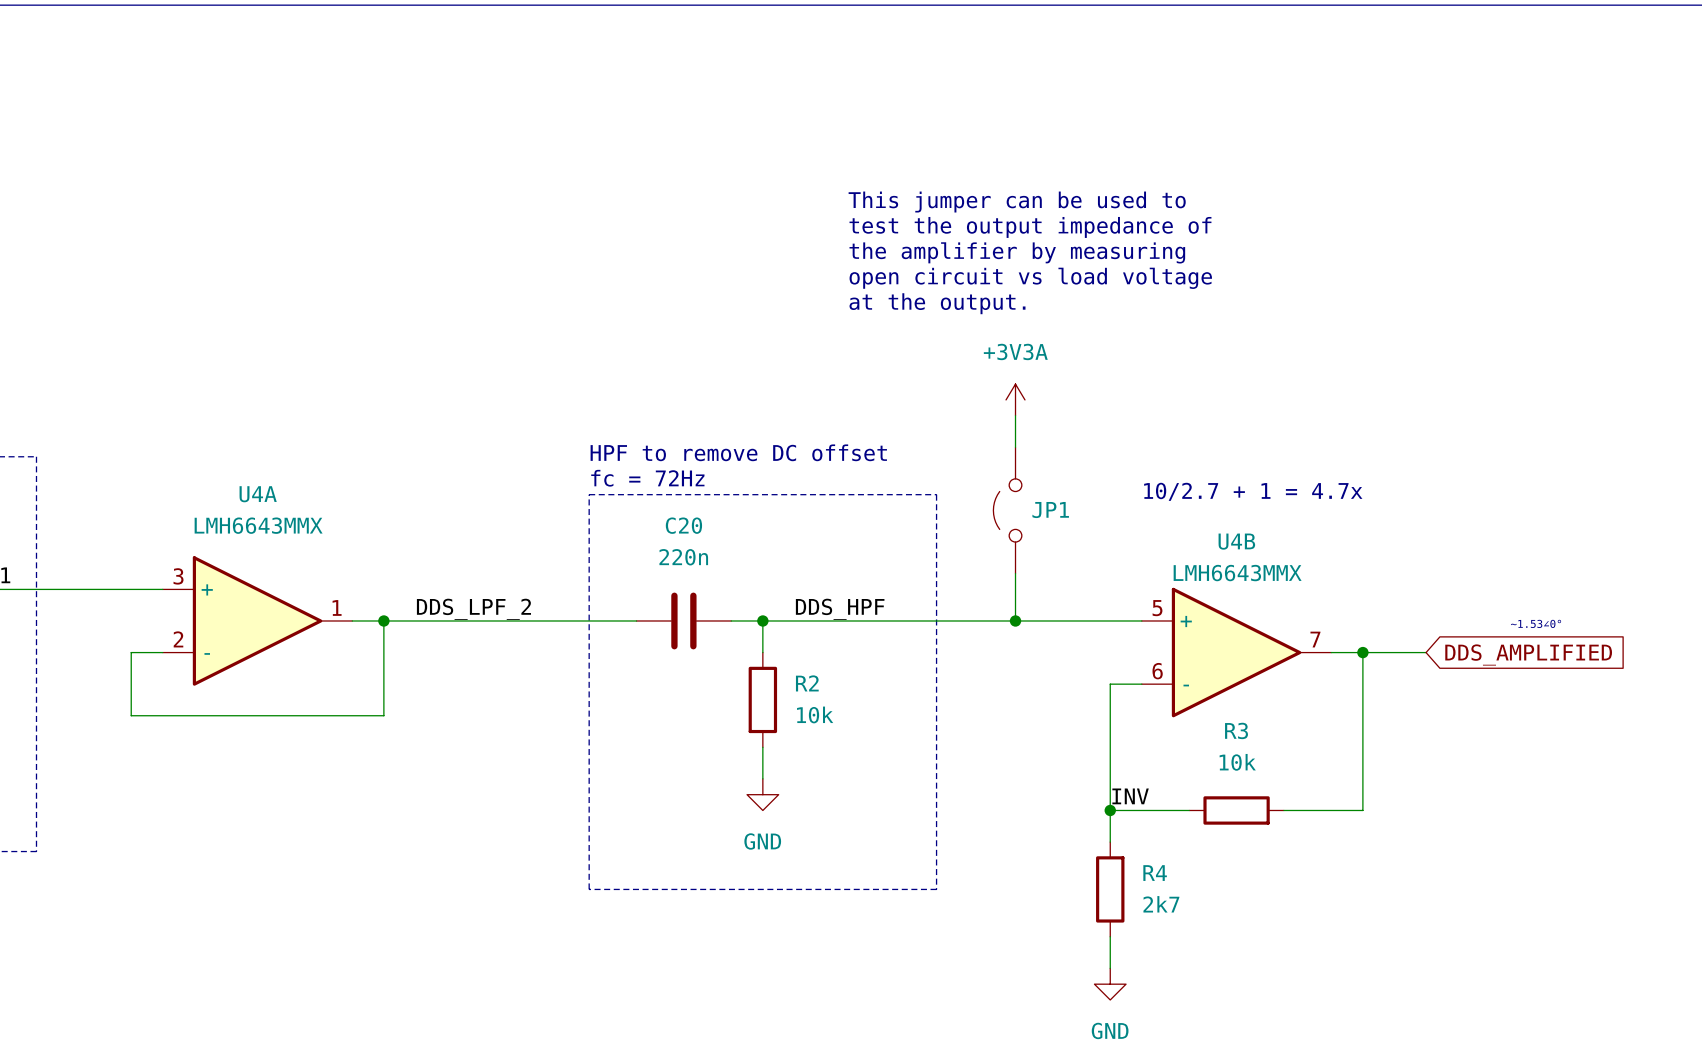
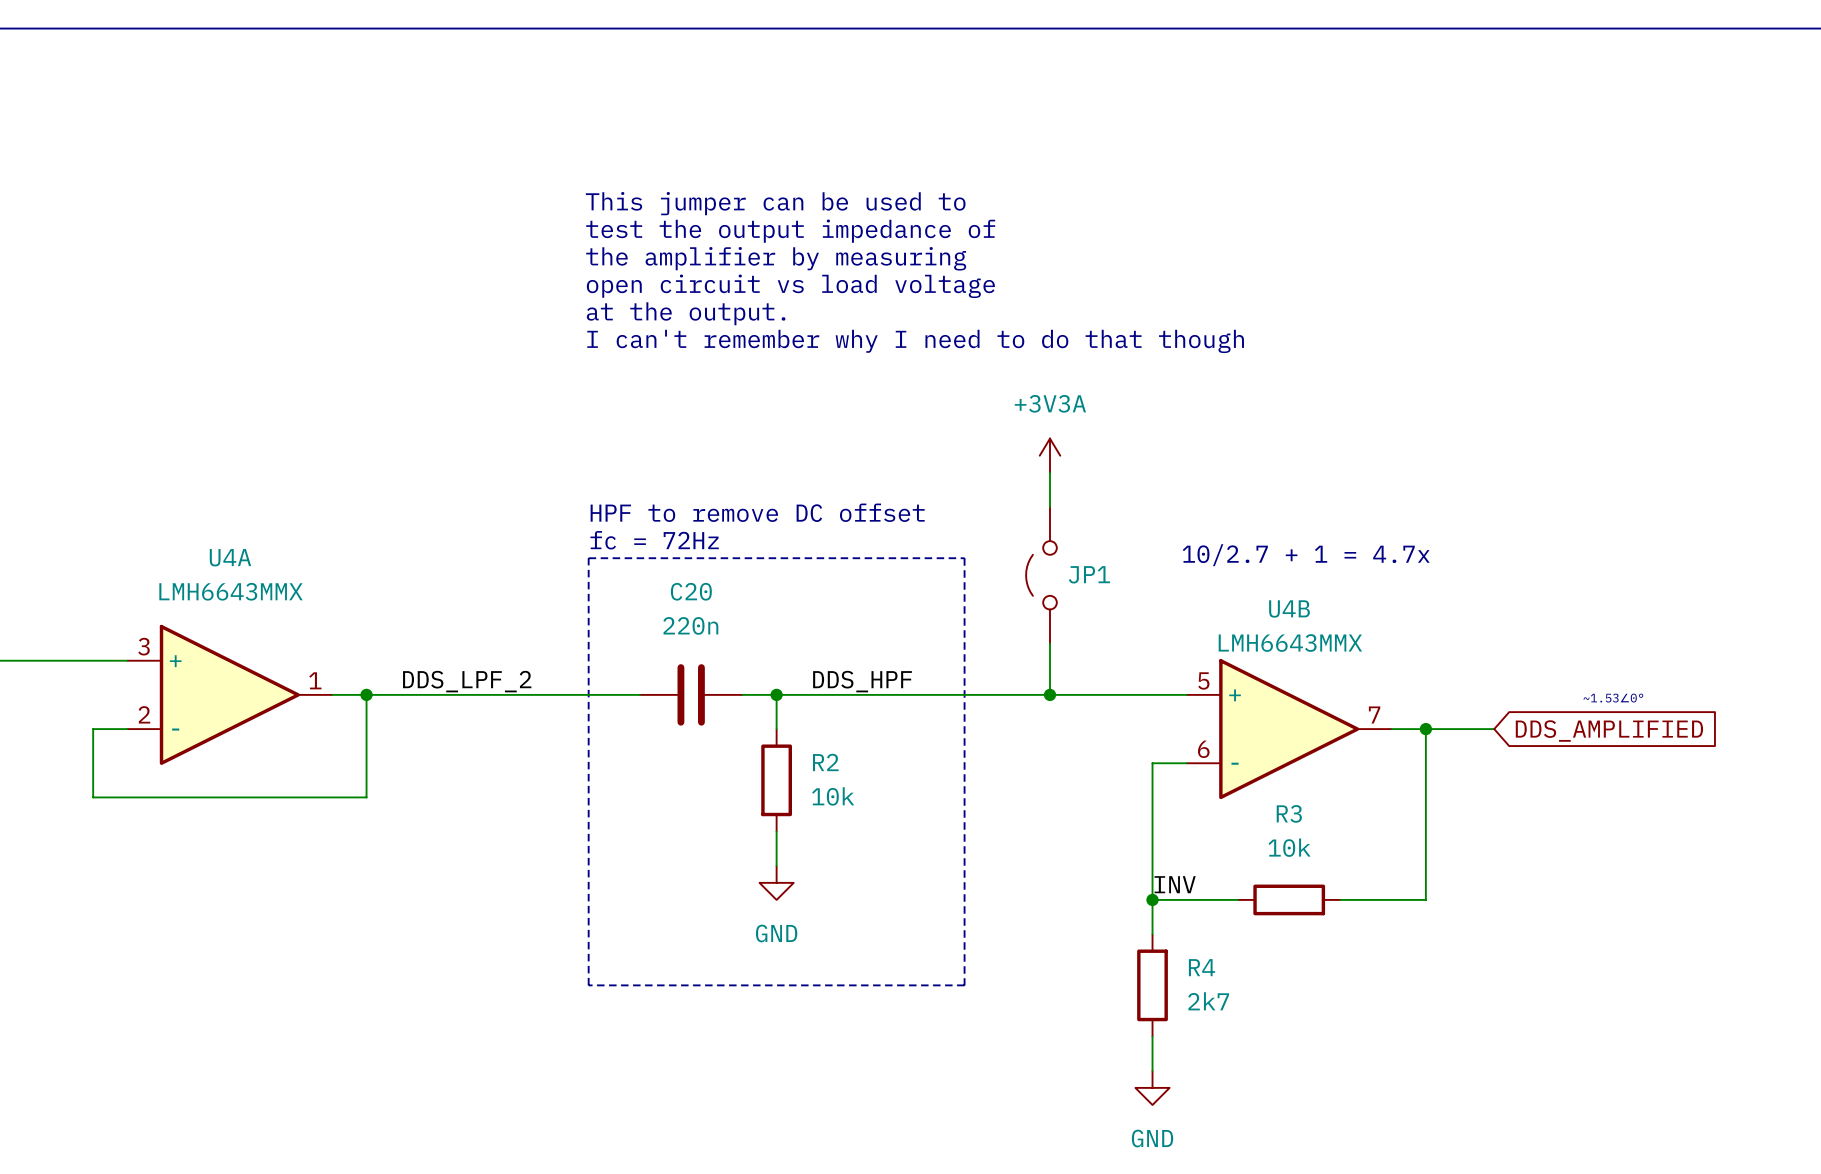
text position: This jumper can be used to (1017, 202) -> This jumper can be used to (775, 203)
text position: test the output impedance of (1030, 227) -> test the output impedance of (790, 231)
text position: the amplifier by measuring (1017, 252) -> the amplifier by measuring (776, 258)
text position: open circuit vs load voltage (1030, 278) -> open circuit vs load voltage (790, 286)
text: none -> I can't remember why I need to do that though (915, 341)
text position: at the output. (937, 303) -> at the output. (686, 313)

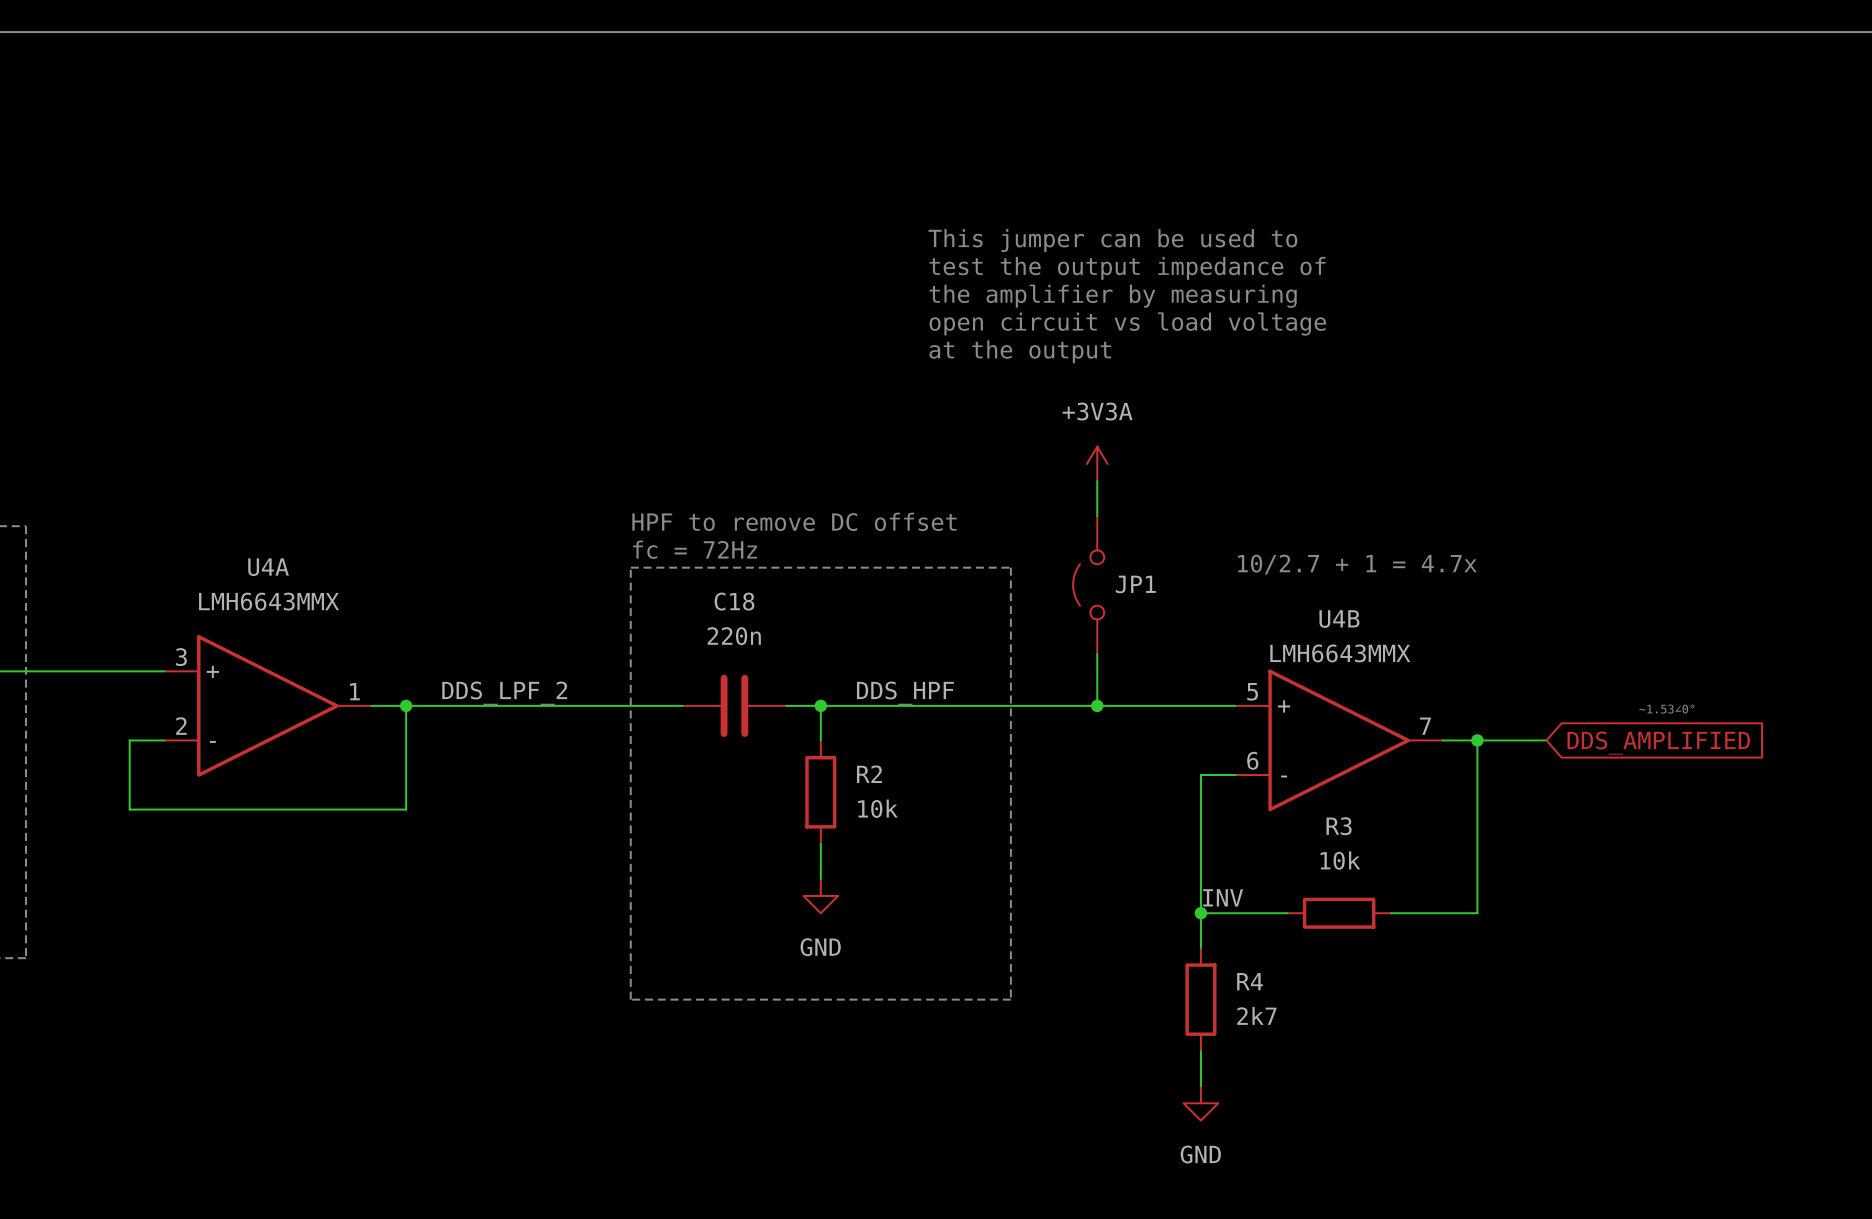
text position: This jumper can be used to (775, 203) -> This jumper can be used to (1112, 240)
text position: test the output impedance of (790, 231) -> test the output impedance of (1127, 268)
text position: the amplifier by measuring (776, 258) -> the amplifier by measuring (1113, 296)
text position: open circuit vs load voltage (790, 286) -> open circuit vs load voltage (1127, 324)
text: at the output. (686, 313) -> none
text: I can't remember why I need to do that though (915, 341) -> none
text: none -> at the output (1020, 351)
C20 name: C20 (691, 591) -> C18 (734, 601)

